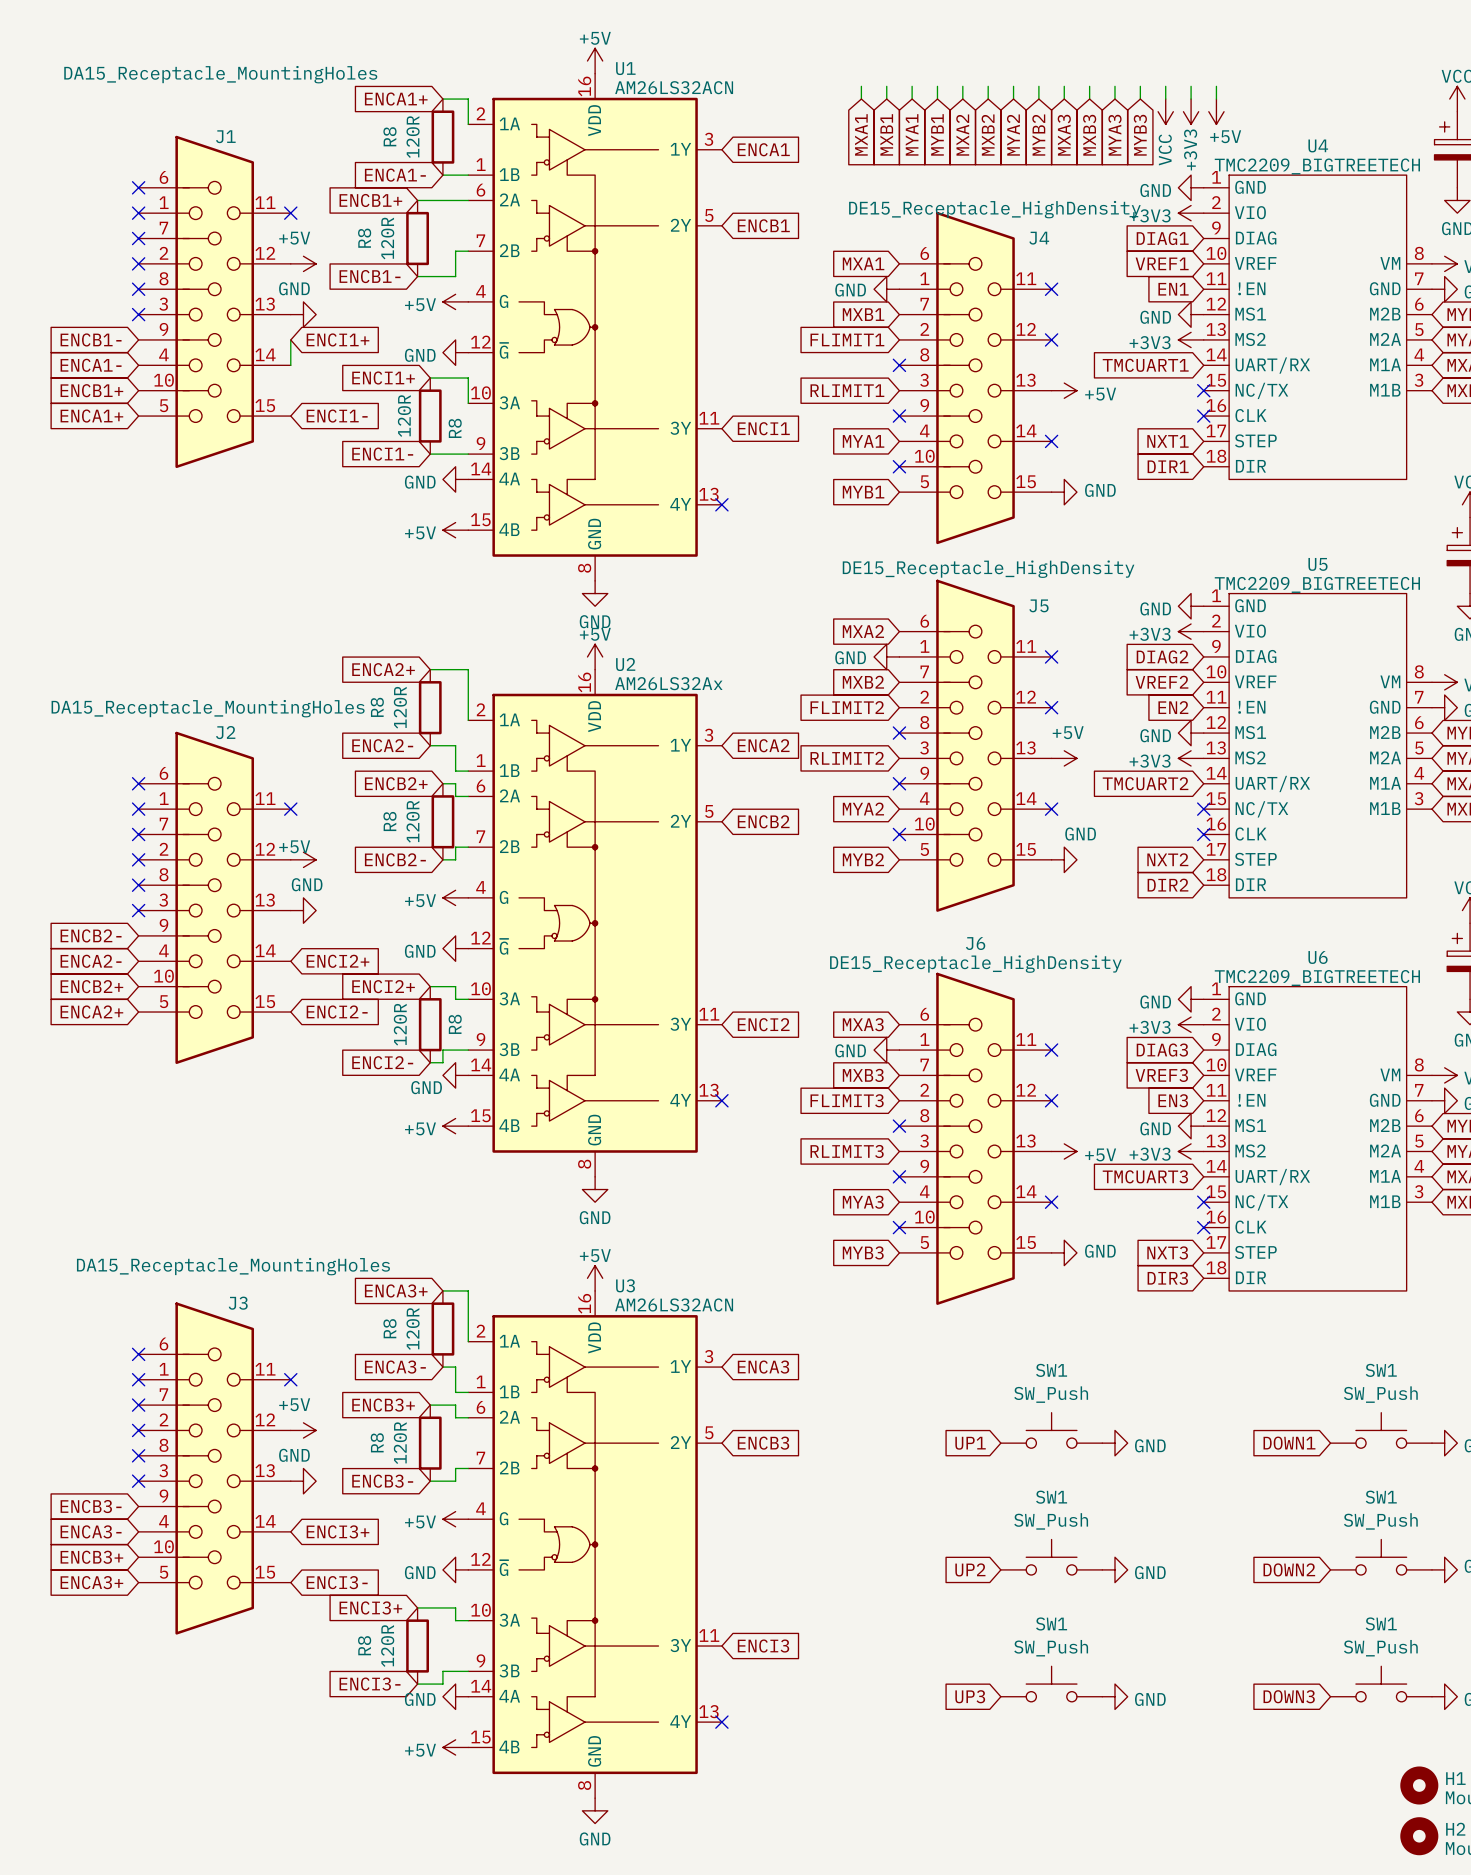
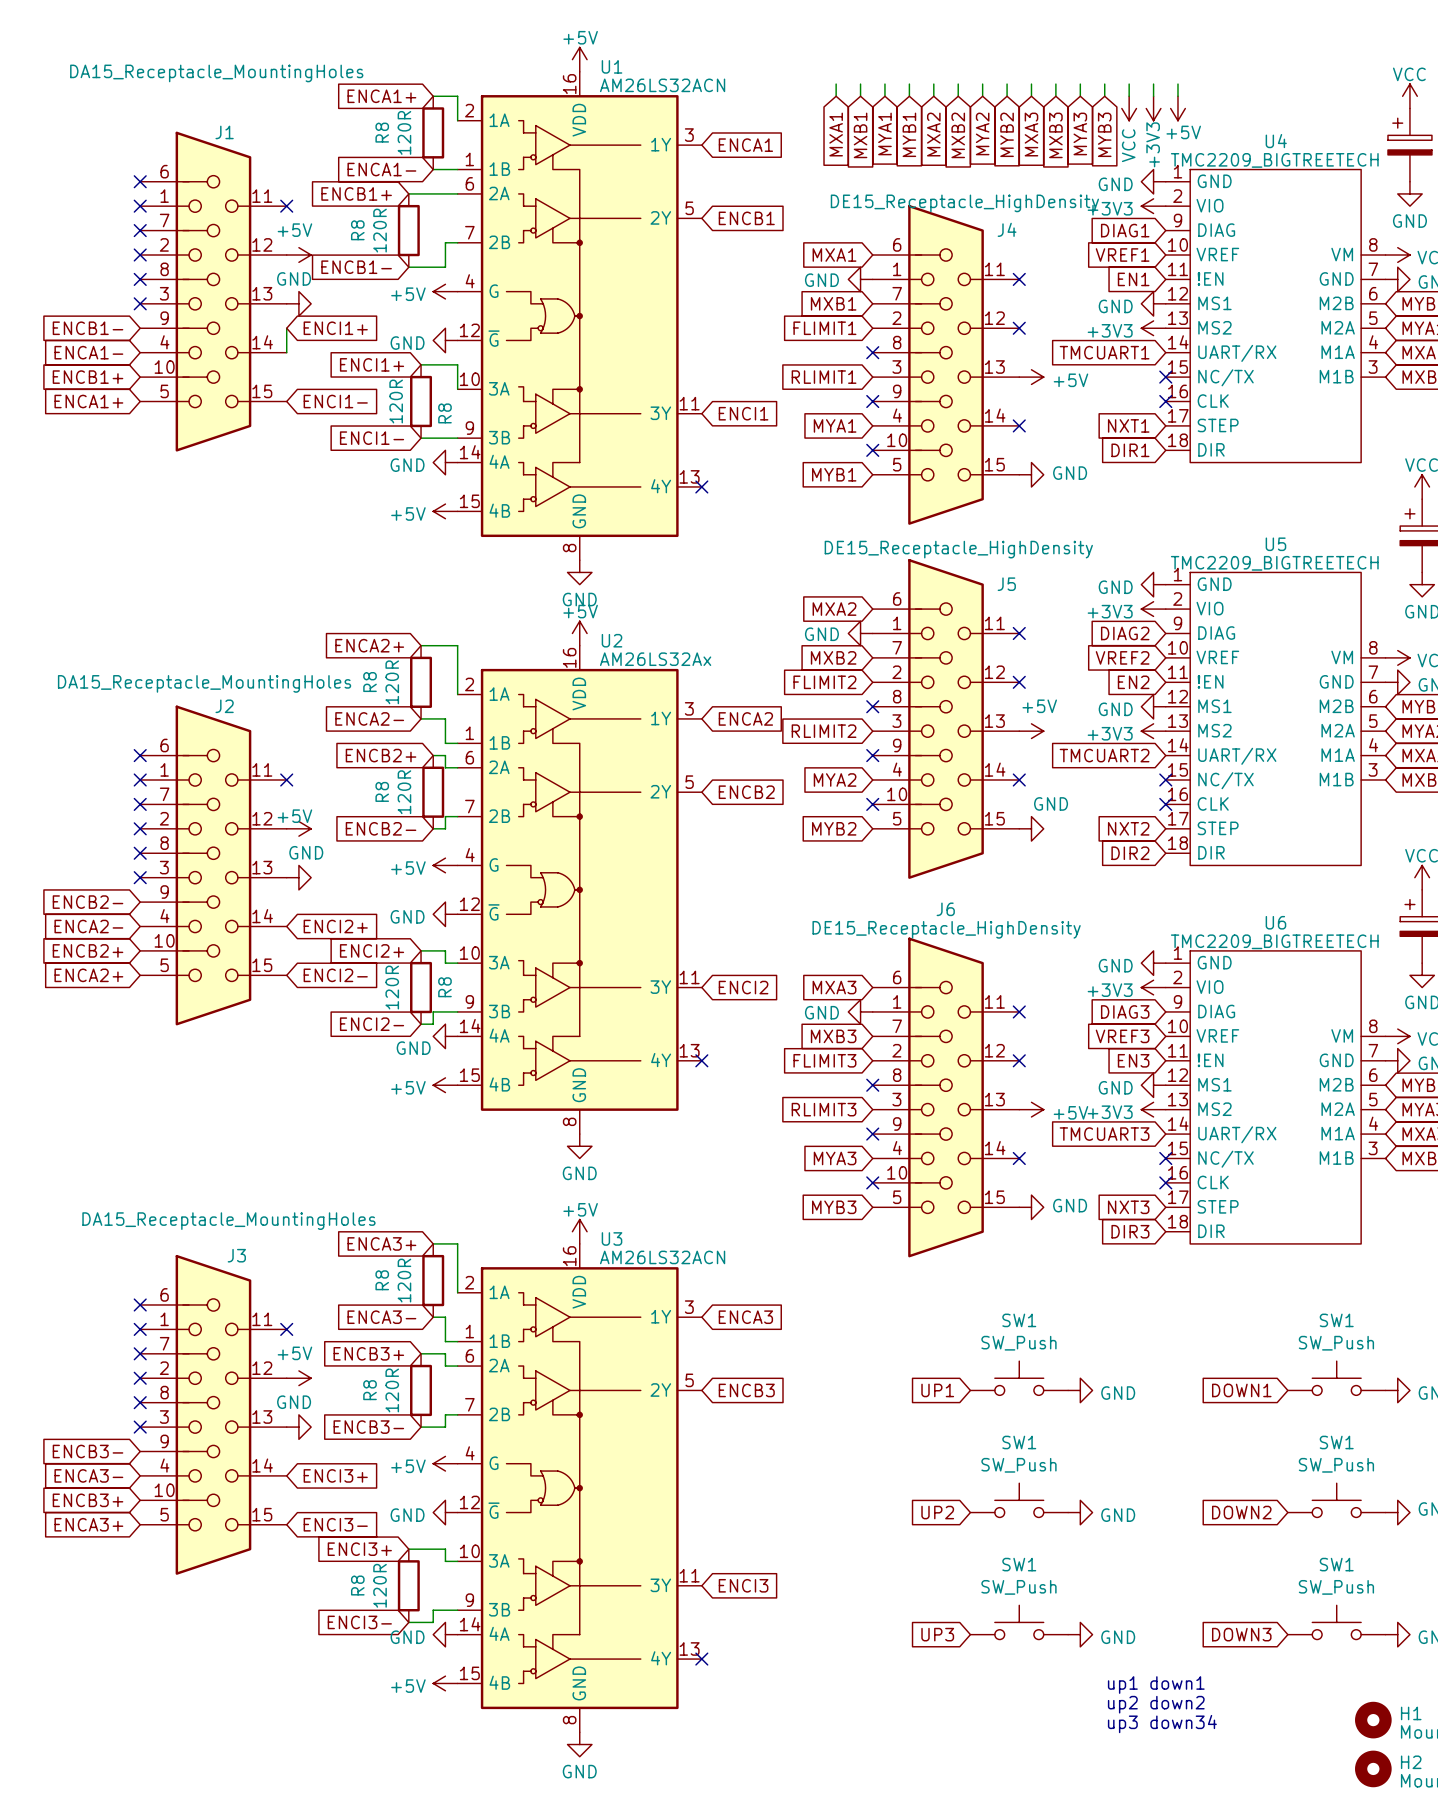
text: none -> up1 down1 (1156, 1685)
text: none -> up2 down2 (1156, 1704)
text: none -> up3 down34 (1162, 1724)

